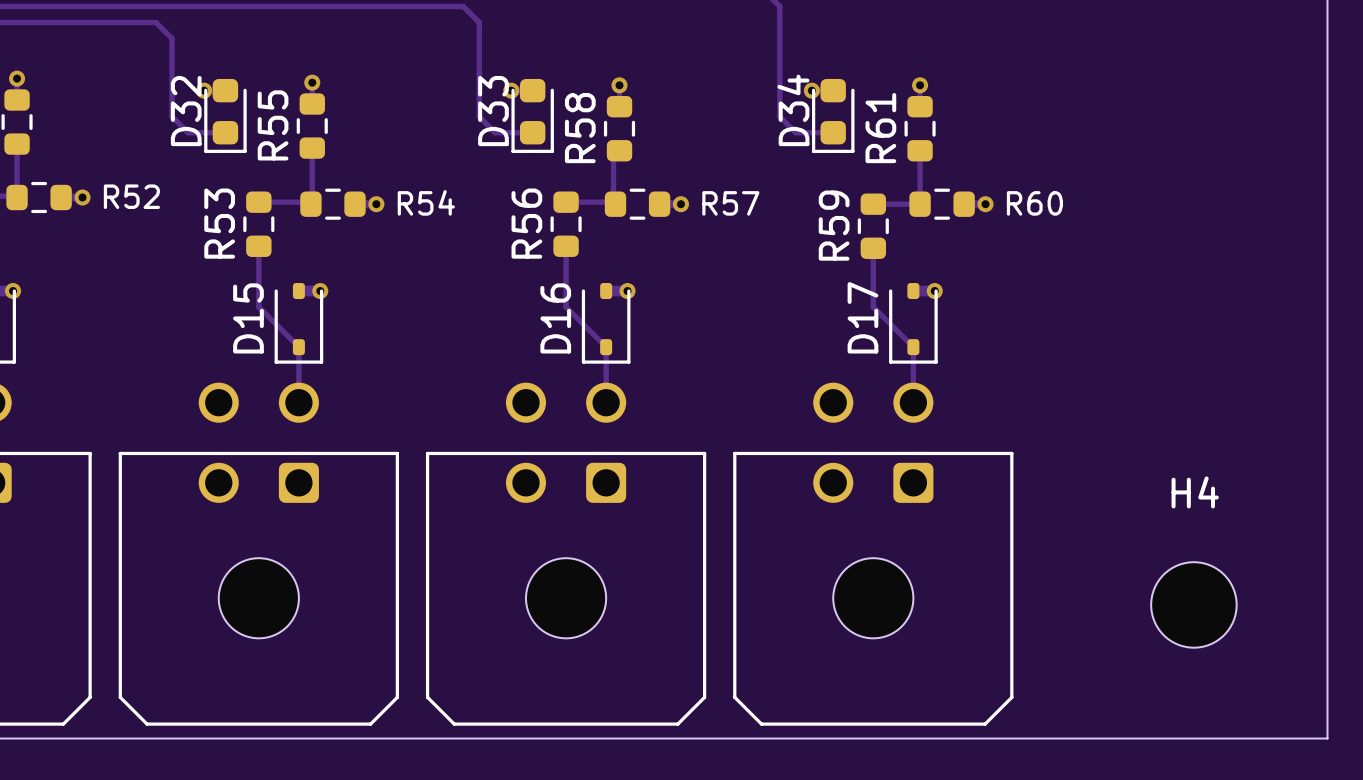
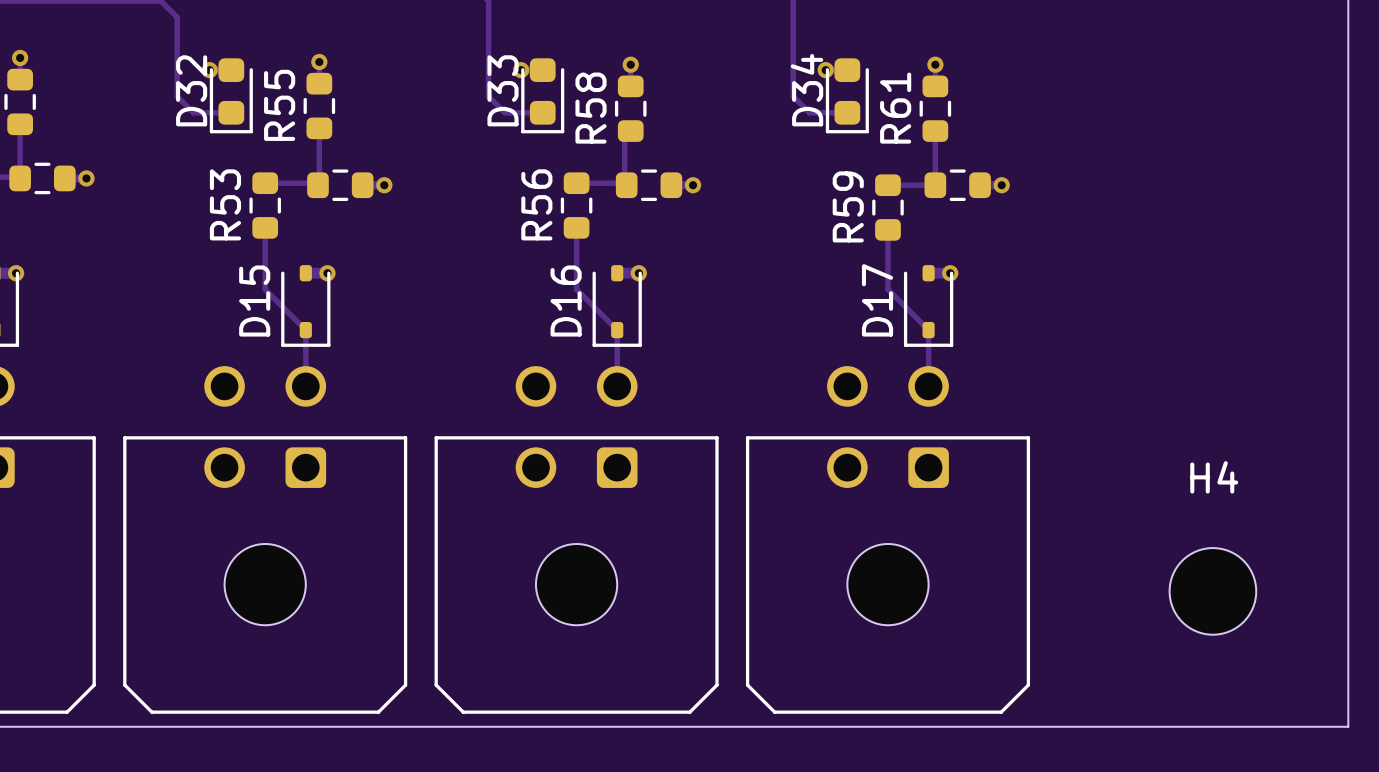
R52 name: R52 (131, 196) -> none
R54 name: R54 (426, 202) -> none
R57 name: R57 (730, 203) -> none
R60 name: R60 (1034, 203) -> none

